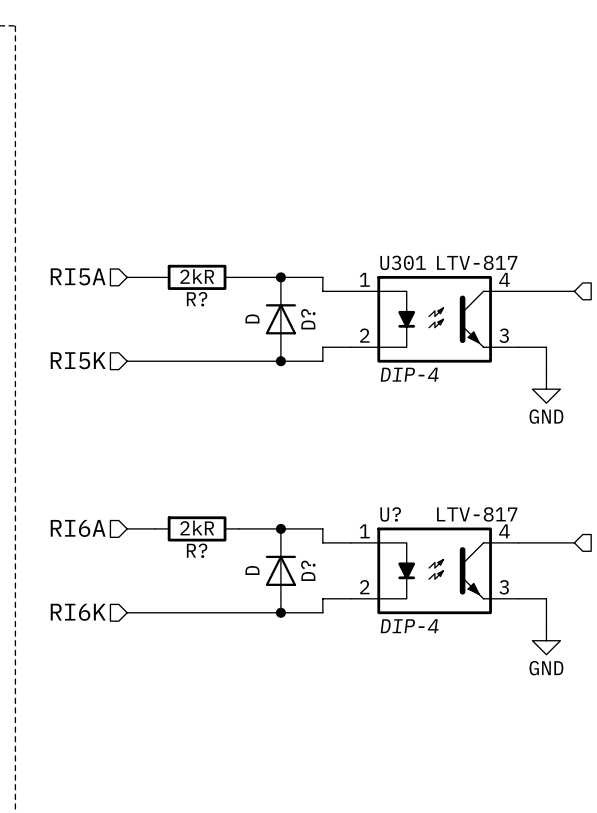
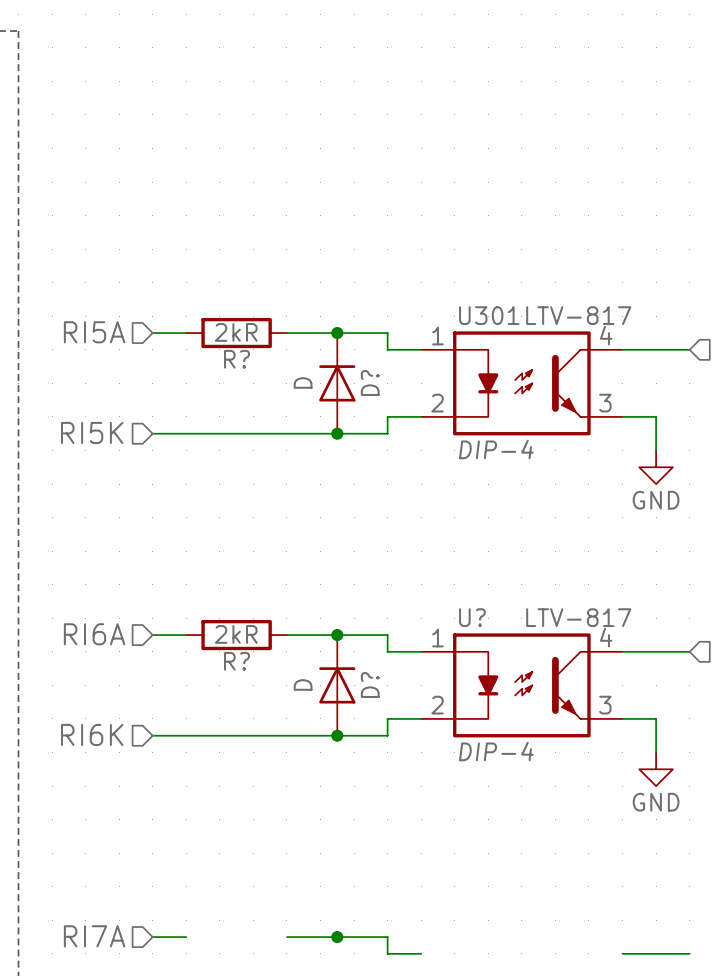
hierarchical label: none -> RI7A (94, 936)
wire: none -> (152, 937) (186, 937)
wire: none -> (286, 937) (387, 937) (387, 953) (421, 953)
junction: none -> (337, 937)
wire: none -> (622, 953) (689, 953)

